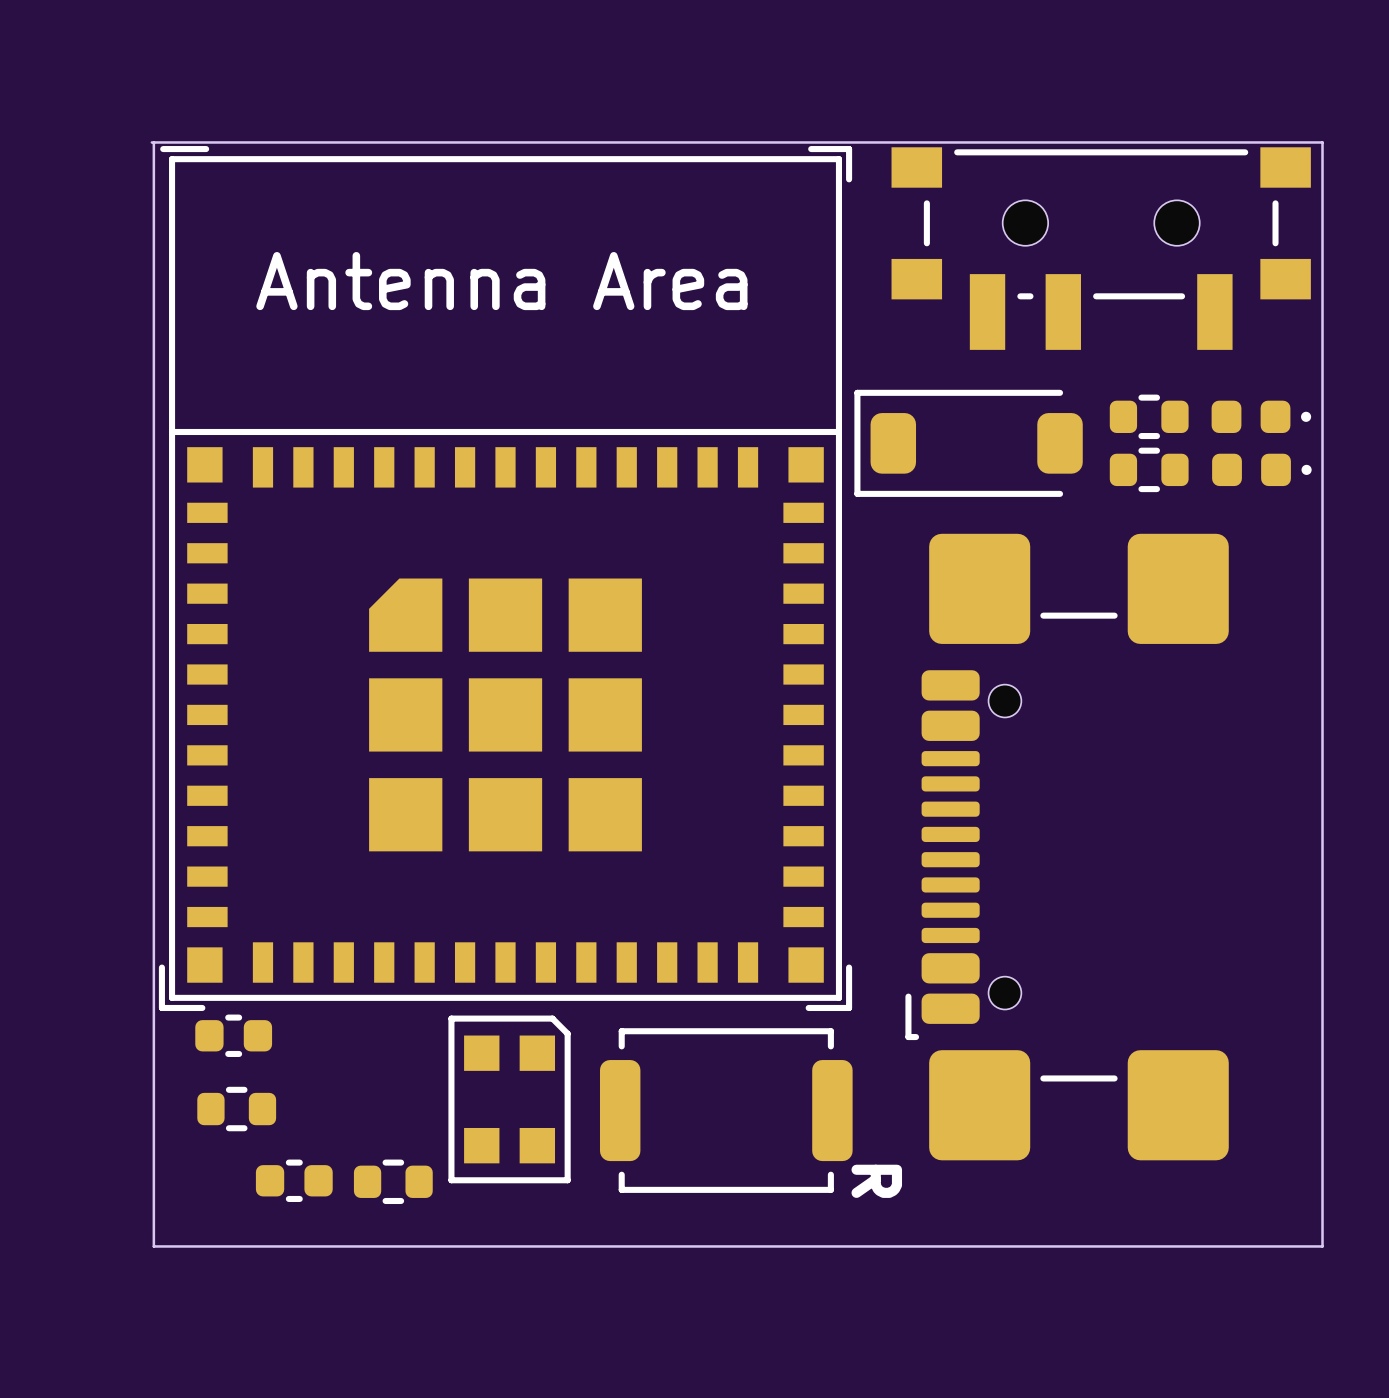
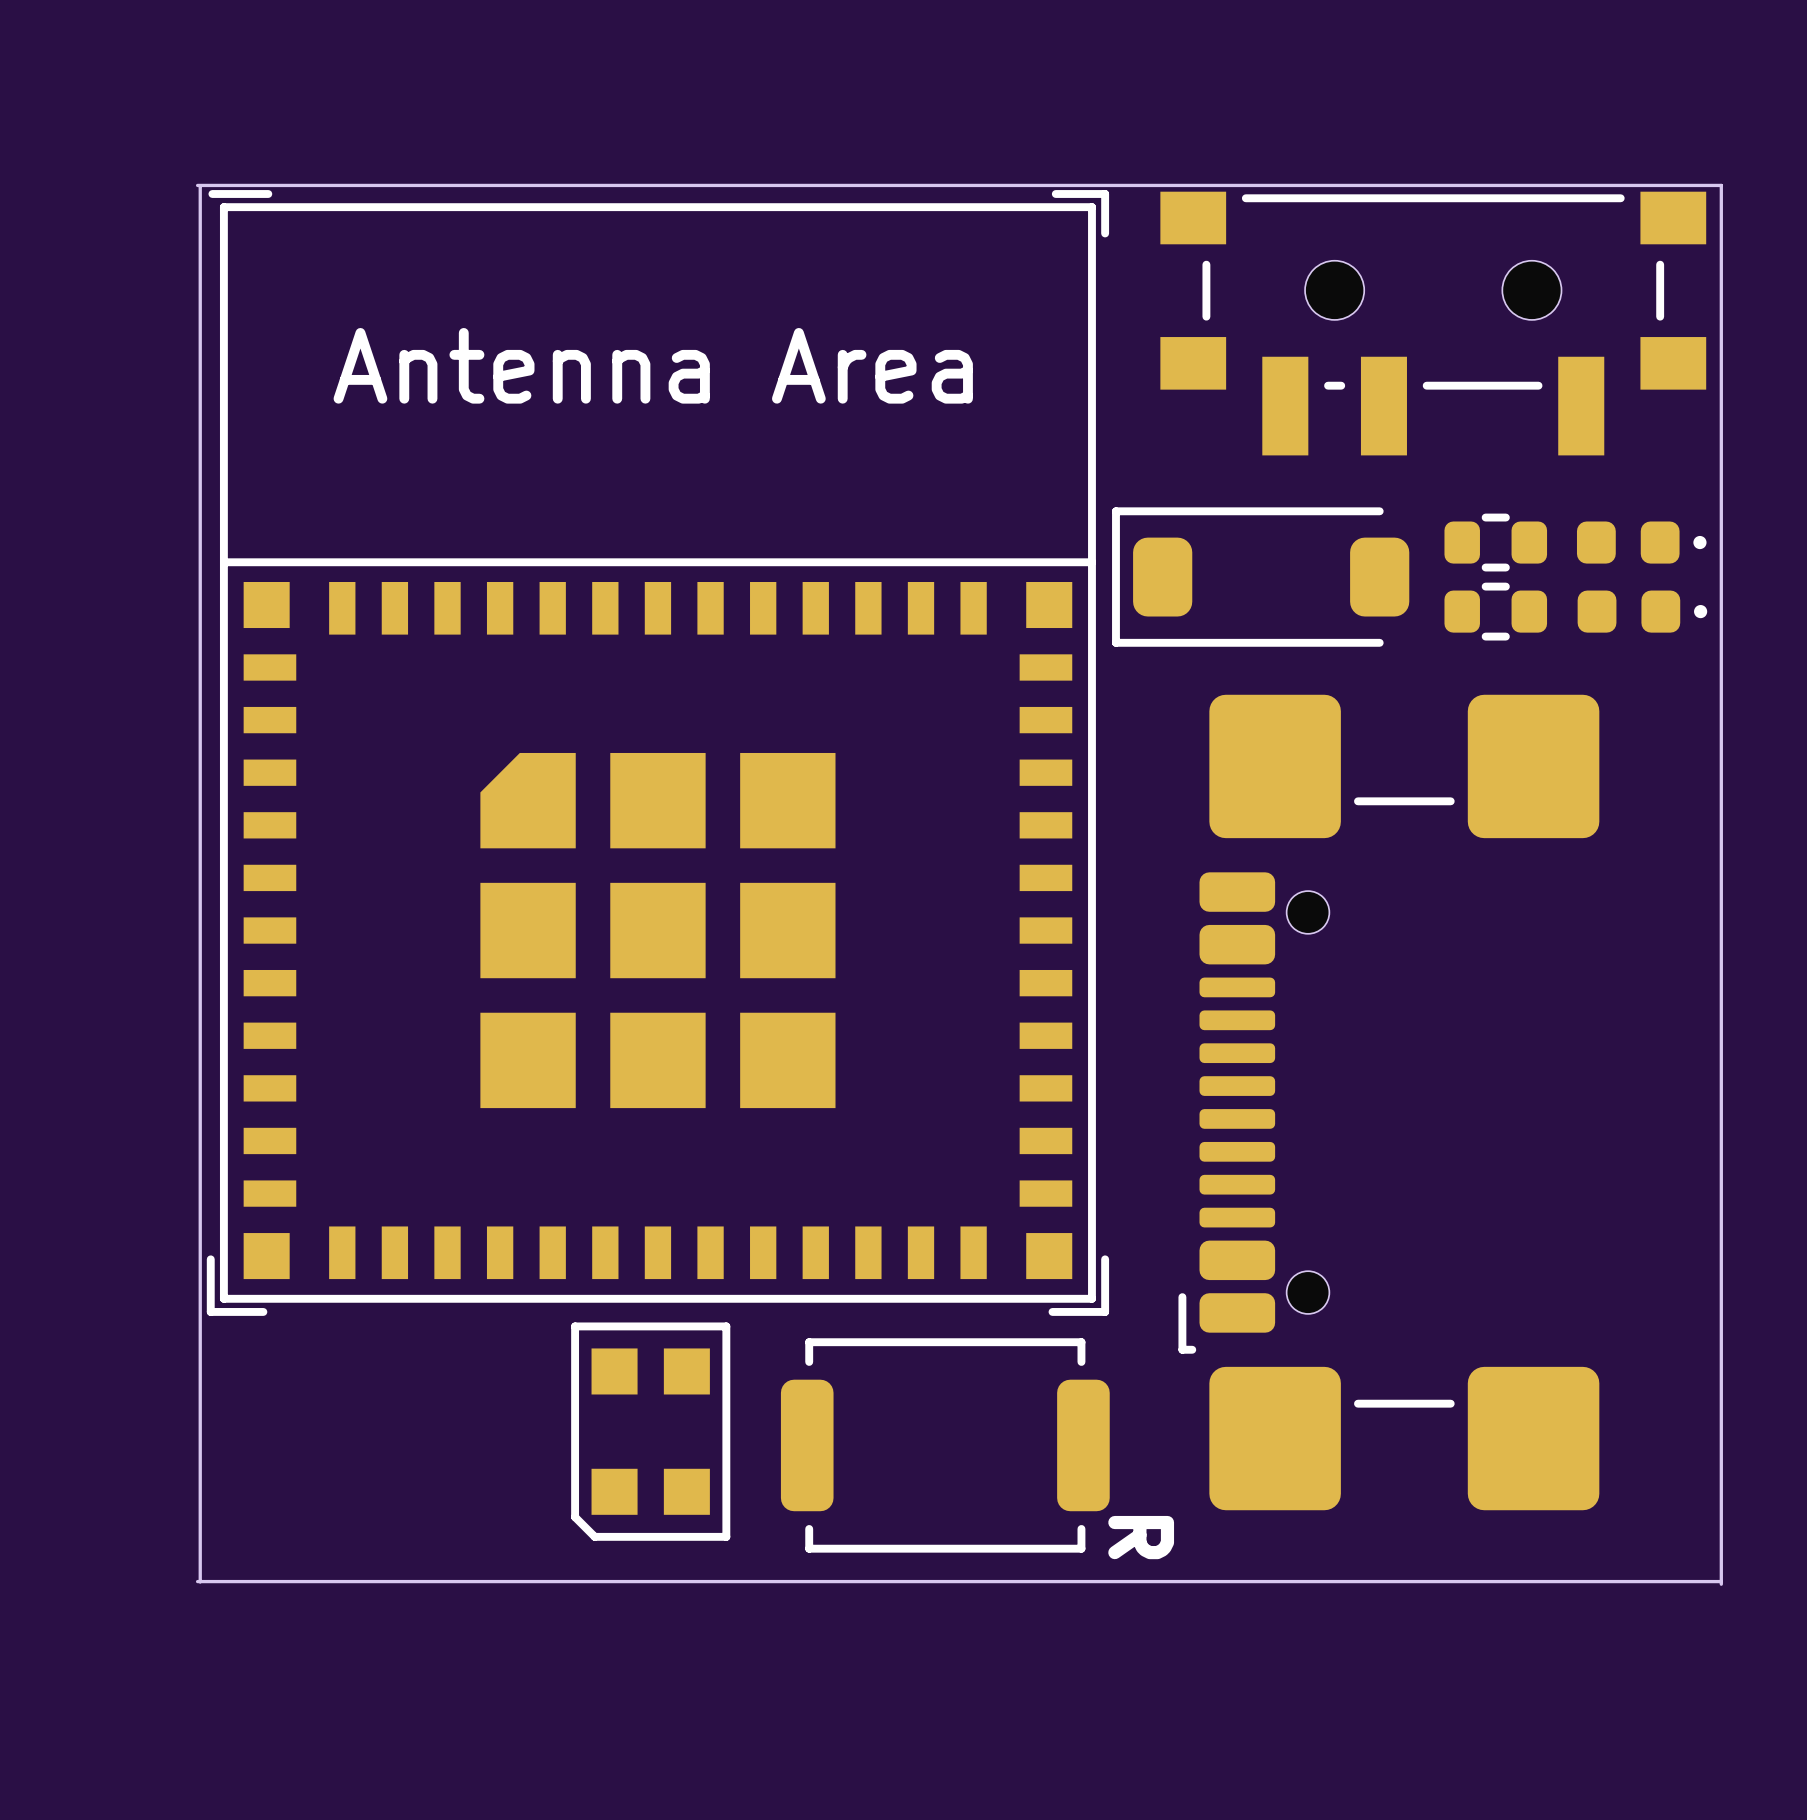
part: (233, 1035) -> none
part rotation: 0° (509, 1099) -> 180° (650, 1431)
part: (236, 1109) -> none
part: (294, 1180) -> none
part: (393, 1181) -> none
board edge: (153, 1215) (153, 1246) (1322, 1246) (1322, 1217) -> (197, 1581) (1721, 1581)

